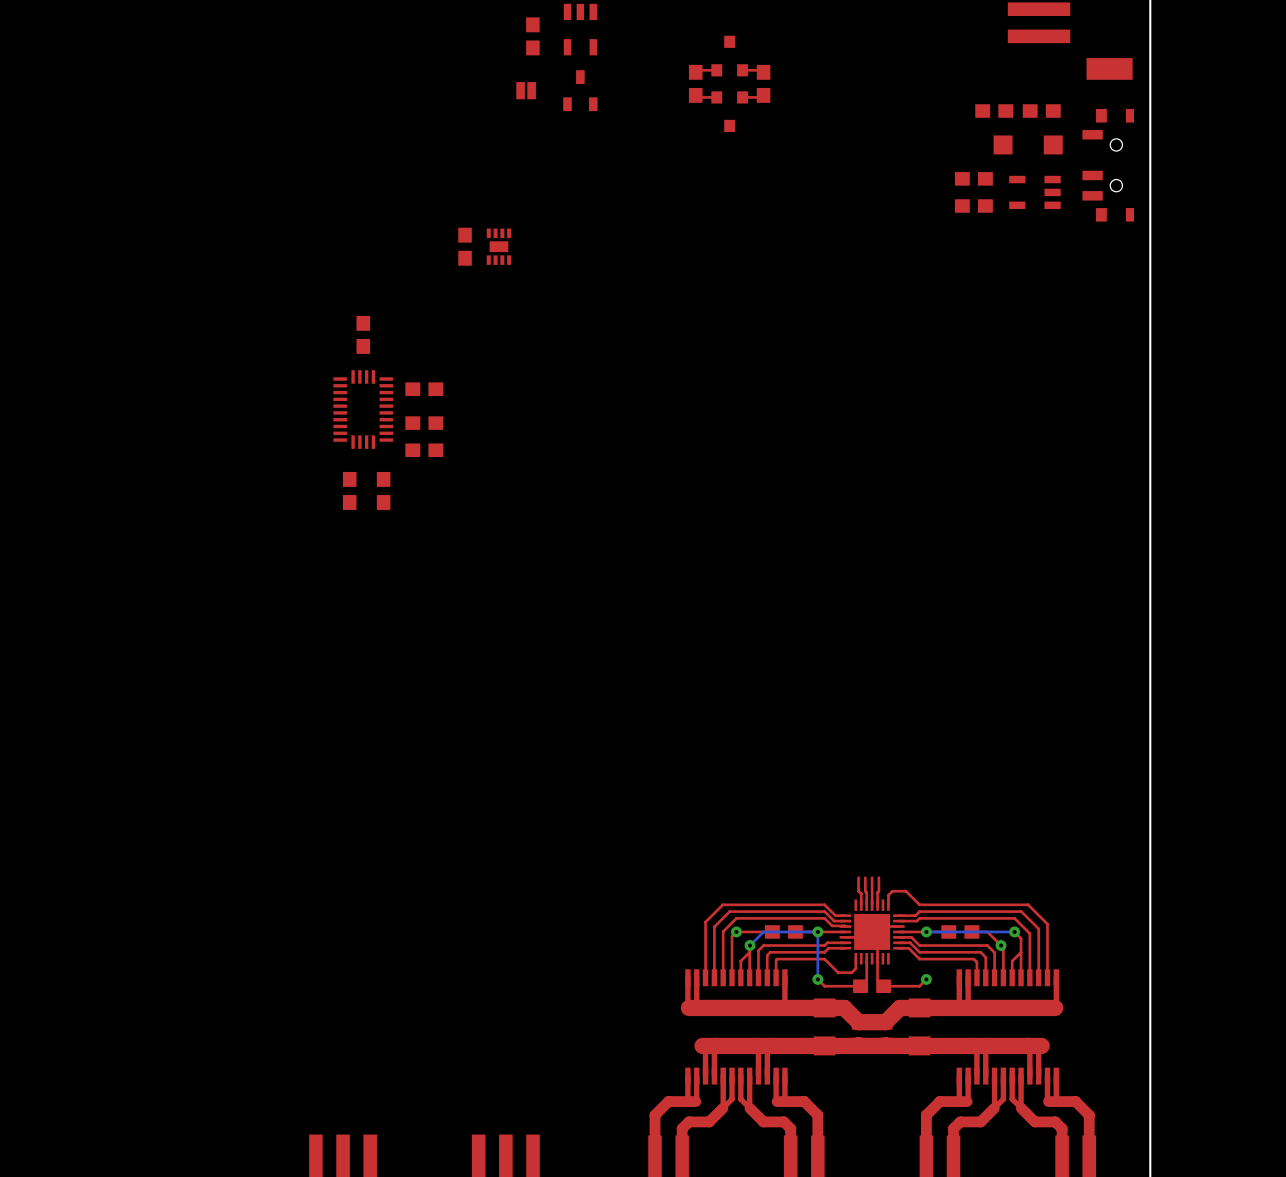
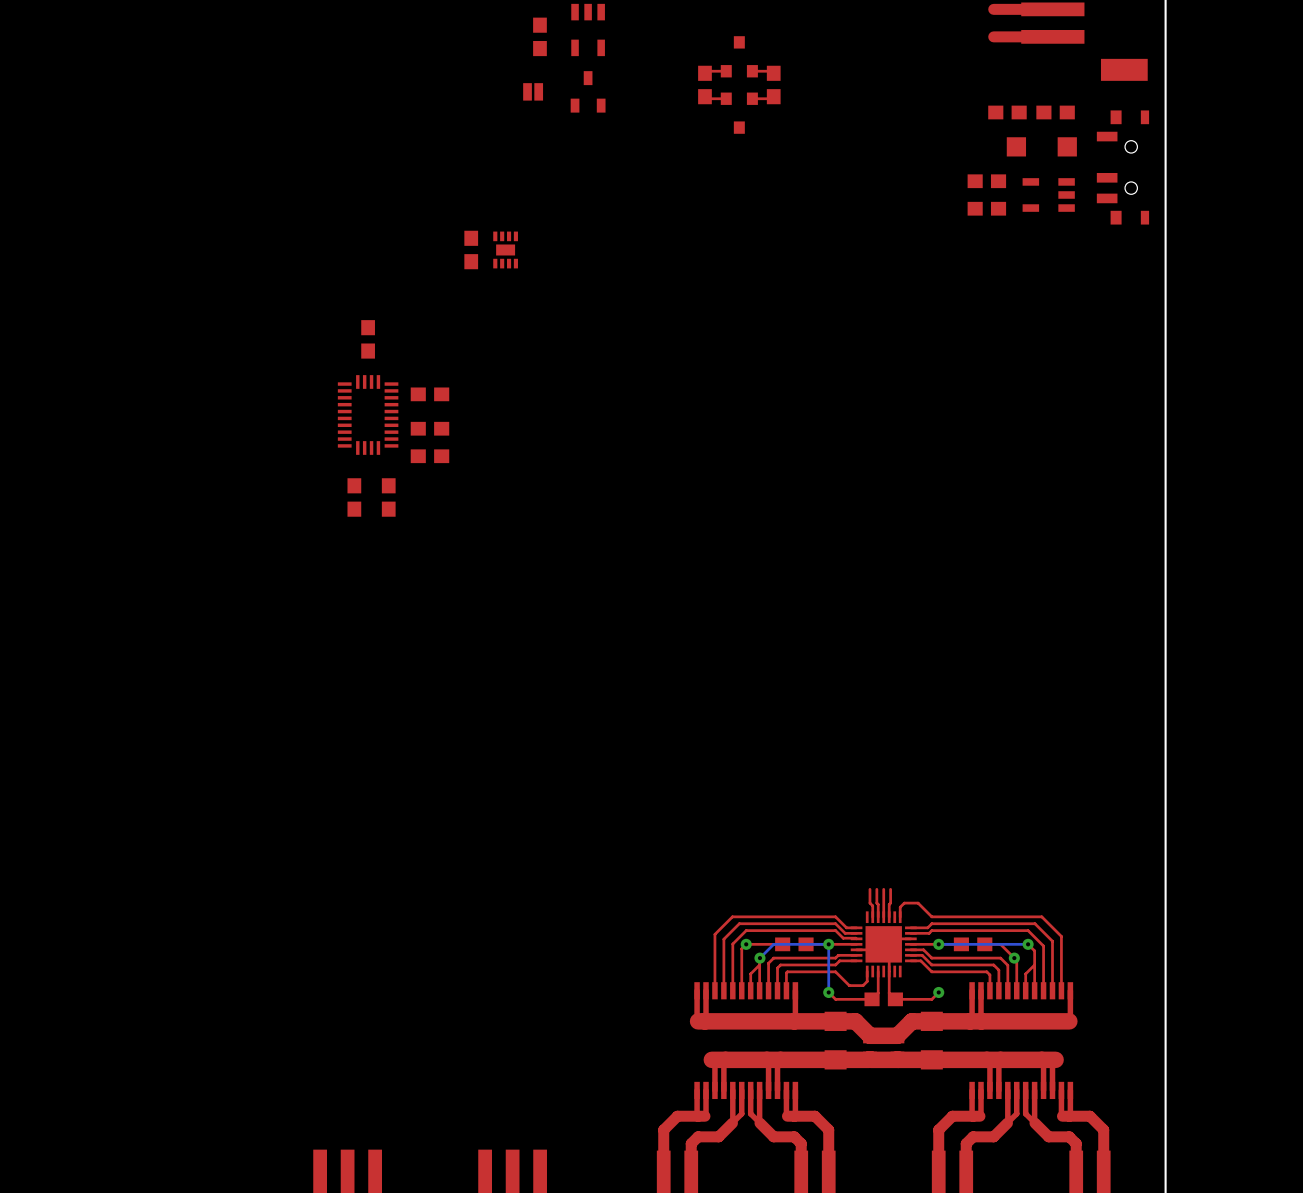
top track: none -> (1052, 9) (993, 9)
top track: none -> (1052, 36) (993, 36)

